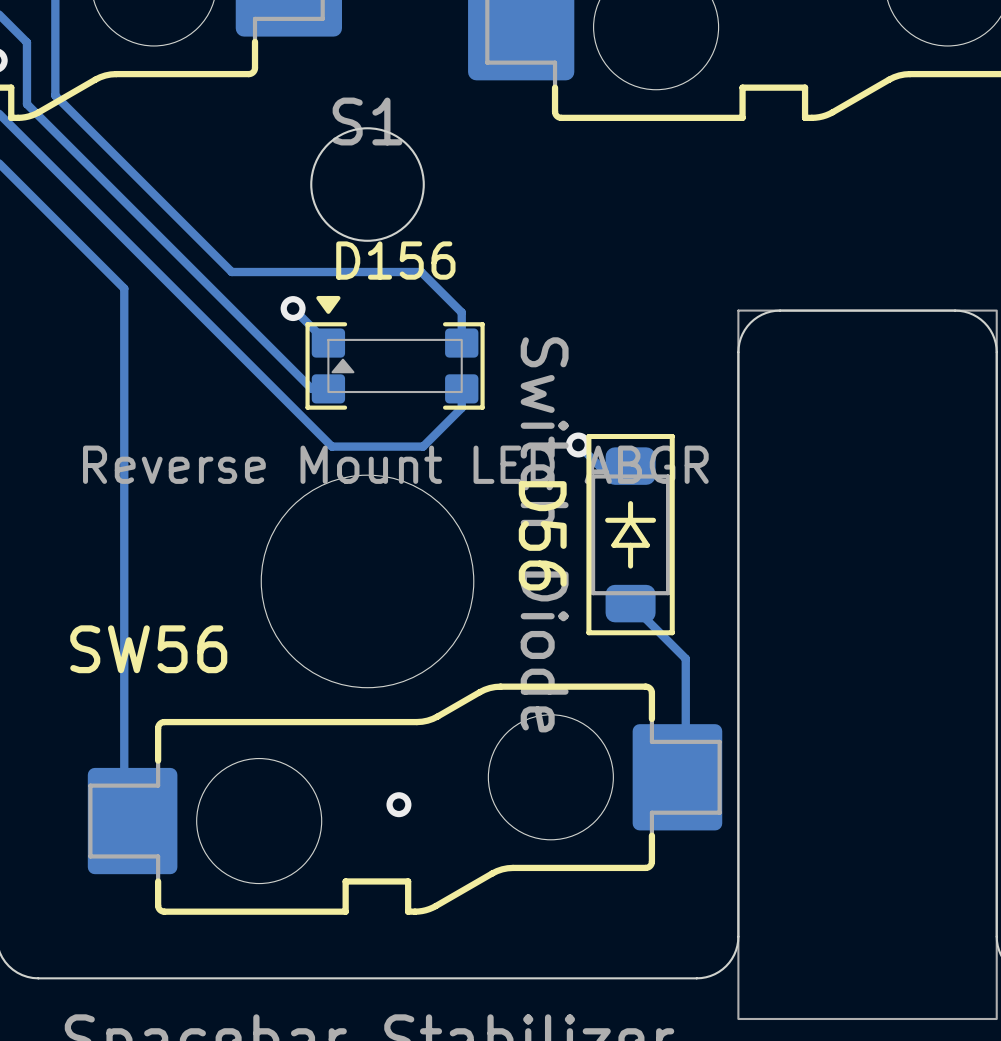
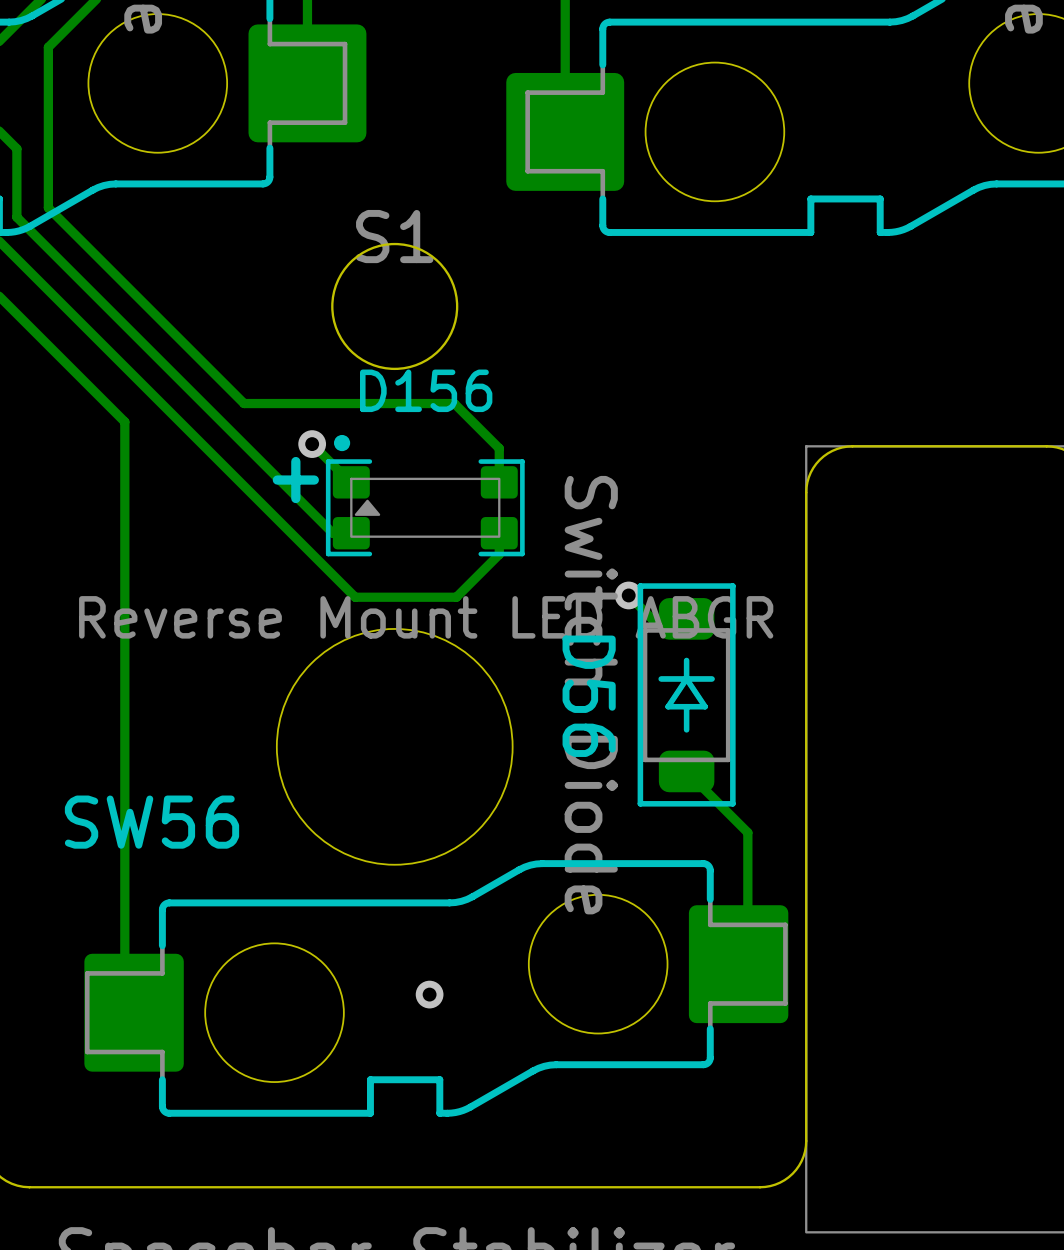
D156 footprint: [305, 295, 485, 425] -> [272, 434, 525, 573]

